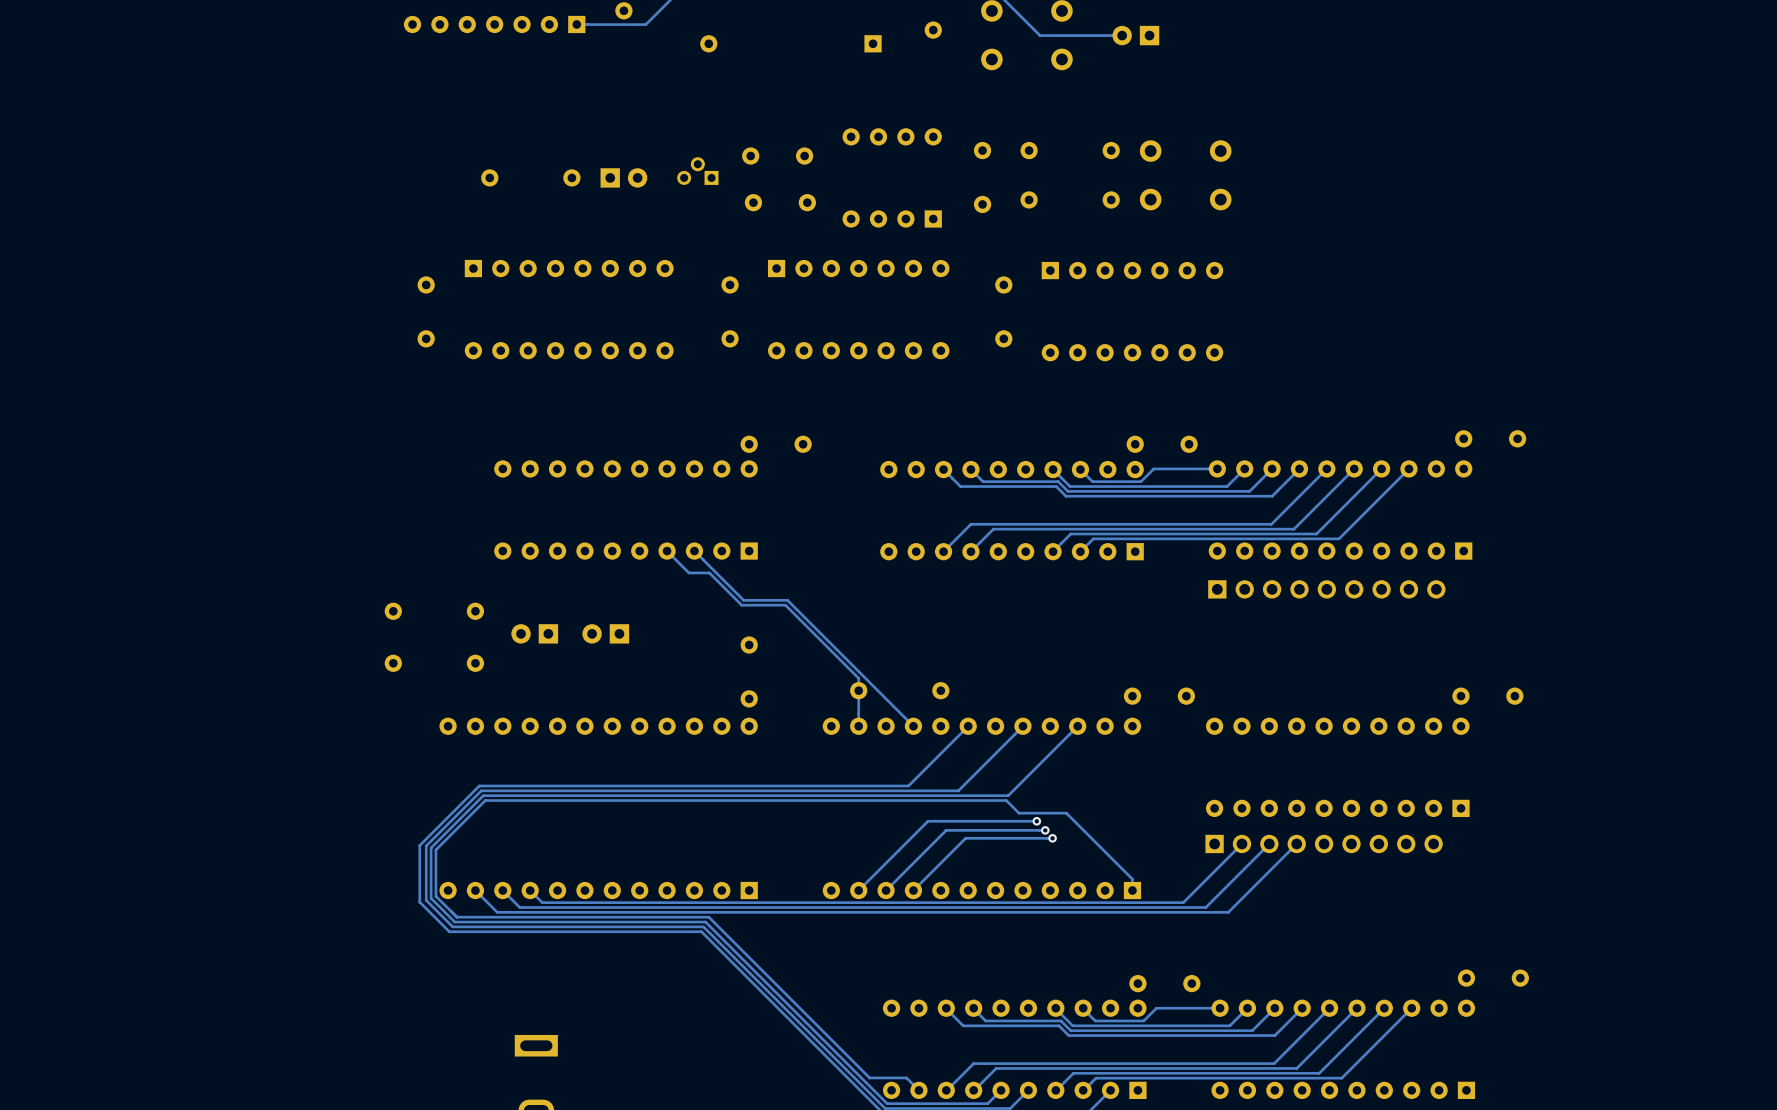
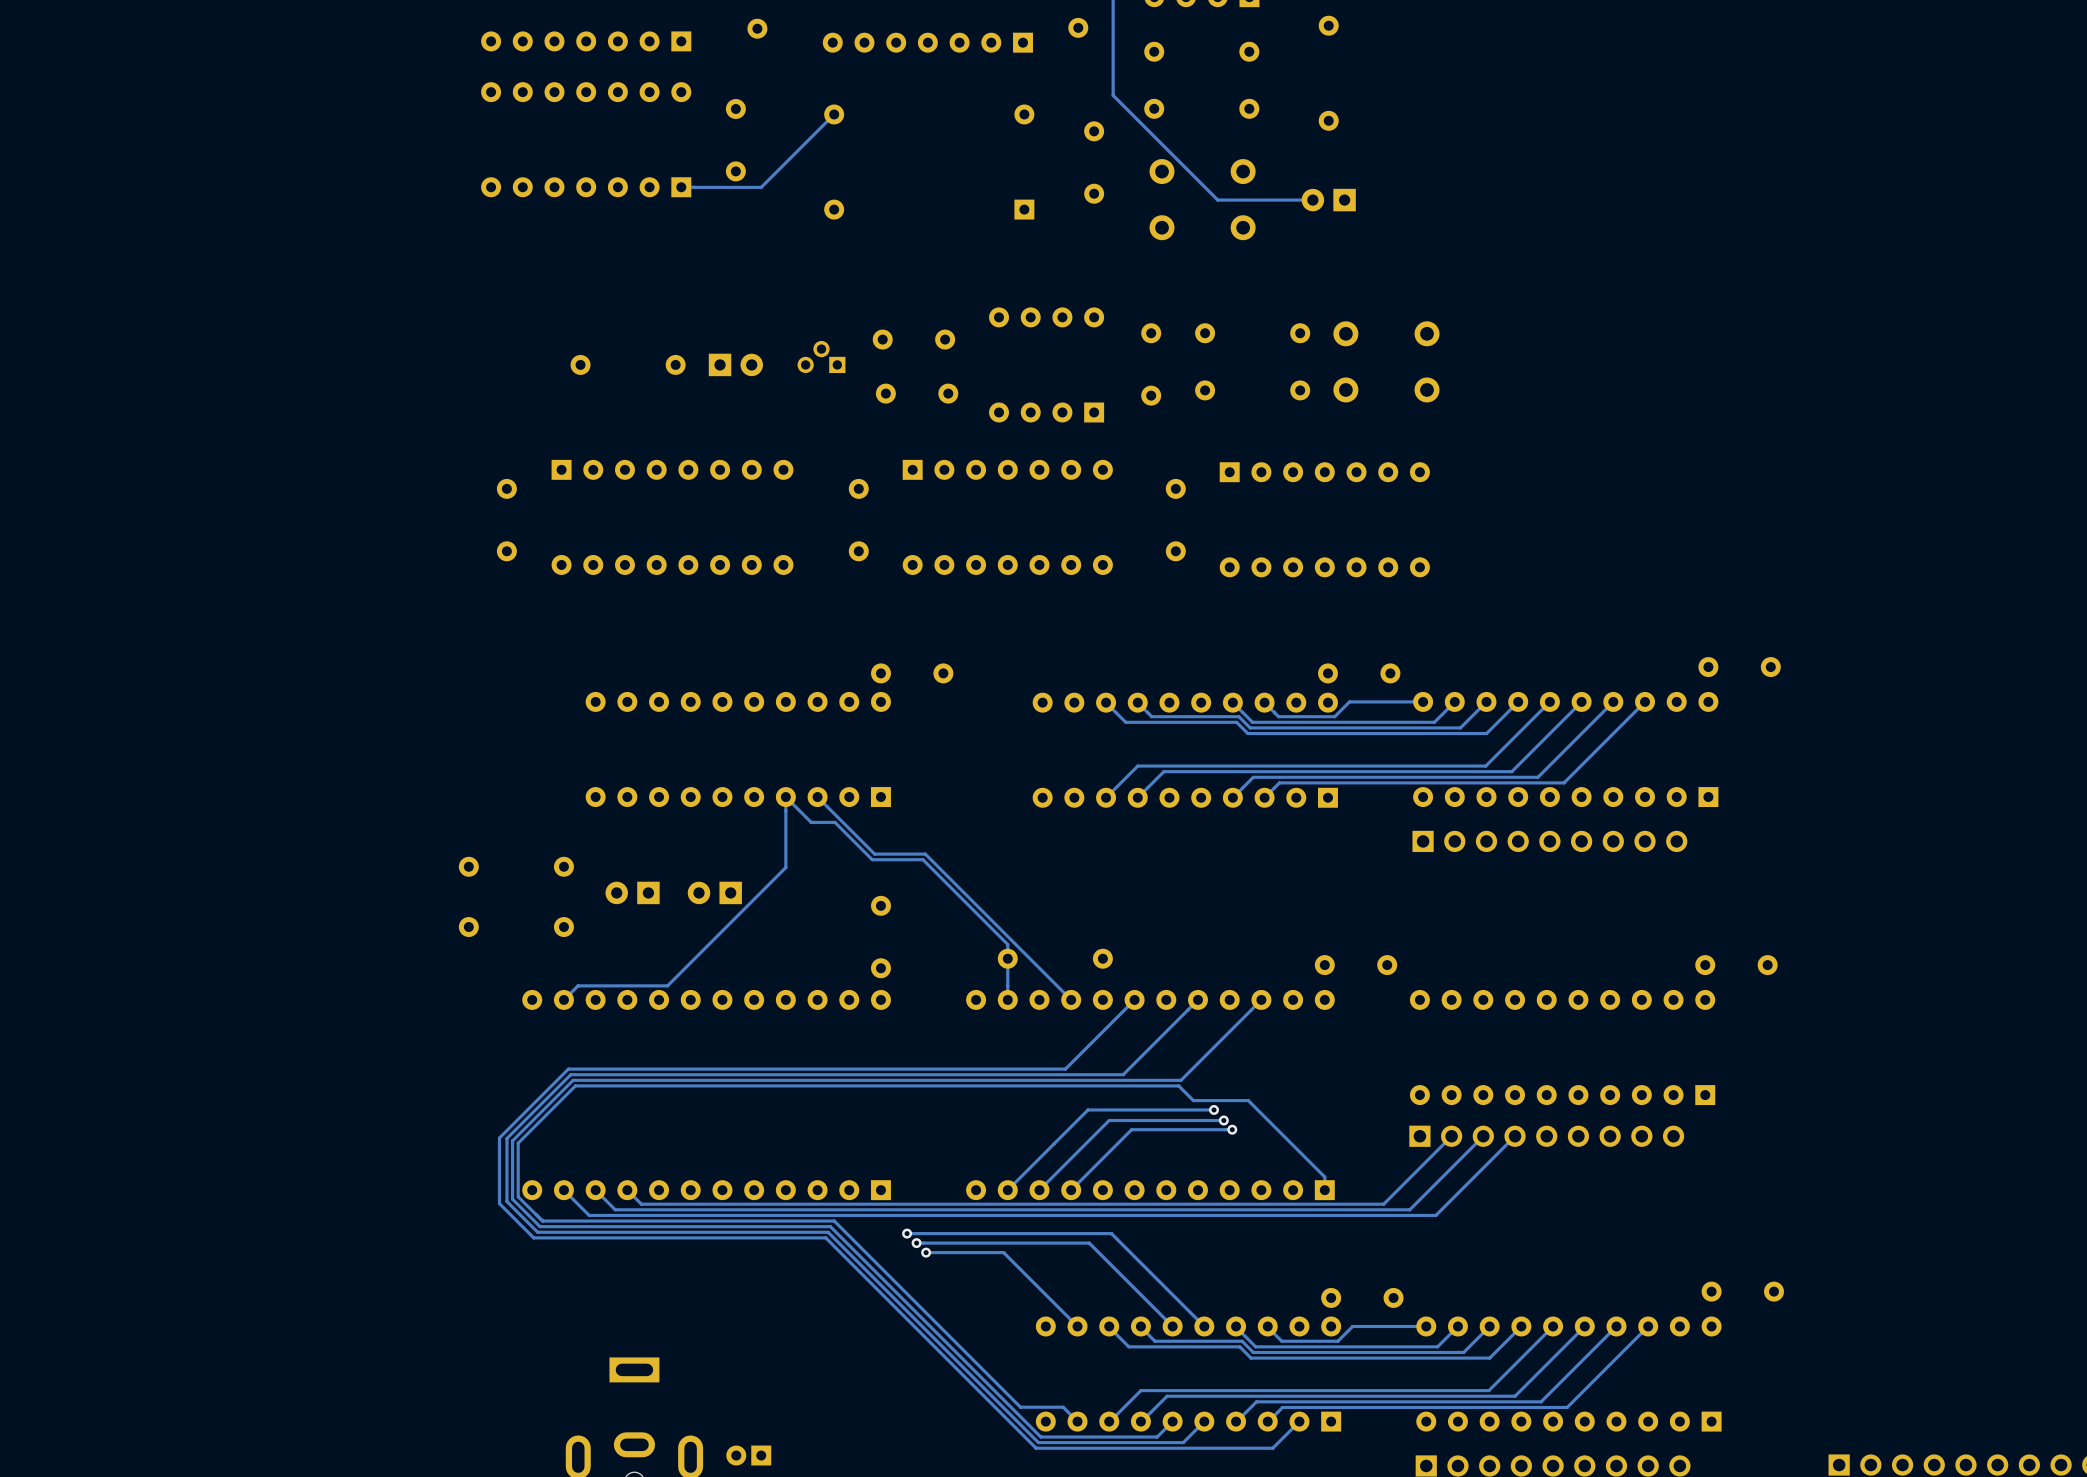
track: none -> (785, 797) (785, 867) (667, 985) (578, 985) (563, 999)
track: none -> (907, 1233) (1111, 1233) (1204, 1326)
via: none -> (907, 1233)
track: none -> (916, 1243) (1089, 1243) (1172, 1326)
via: none -> (916, 1243)
track: none -> (926, 1252) (1003, 1252) (1077, 1326)
via: none -> (926, 1252)

